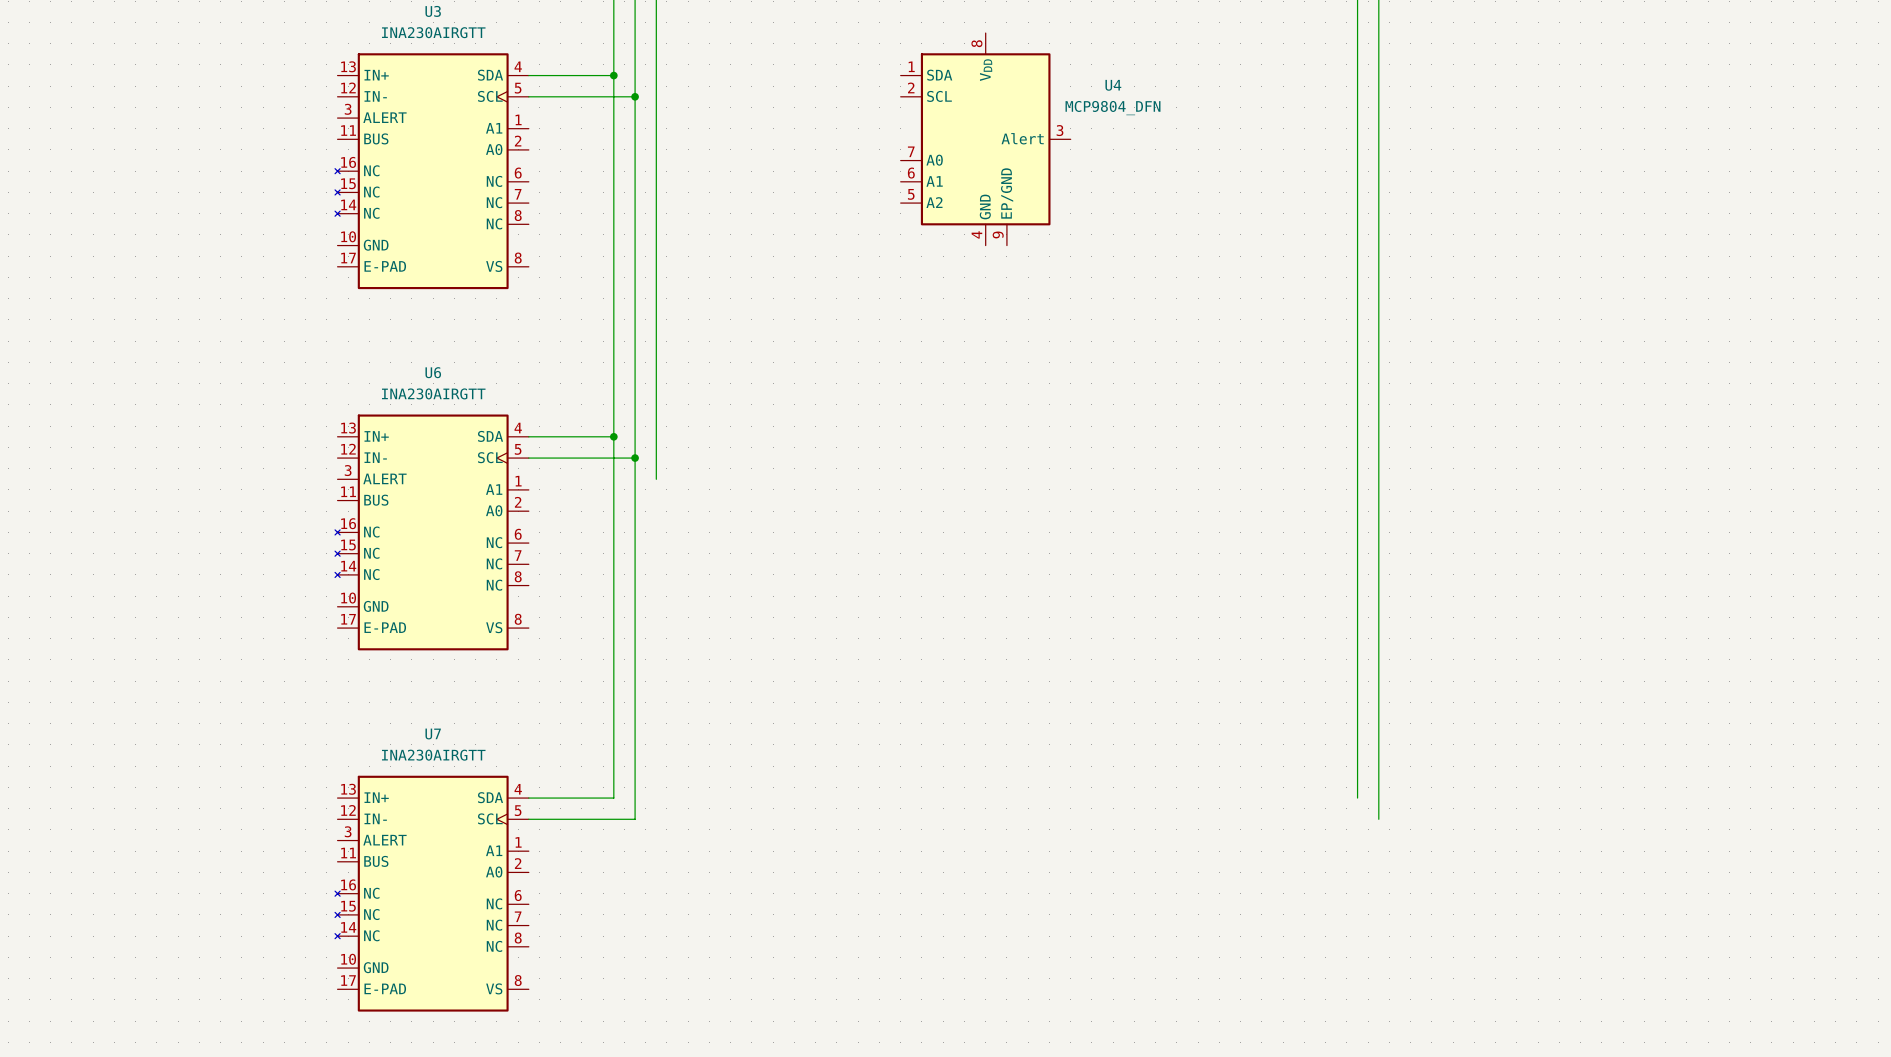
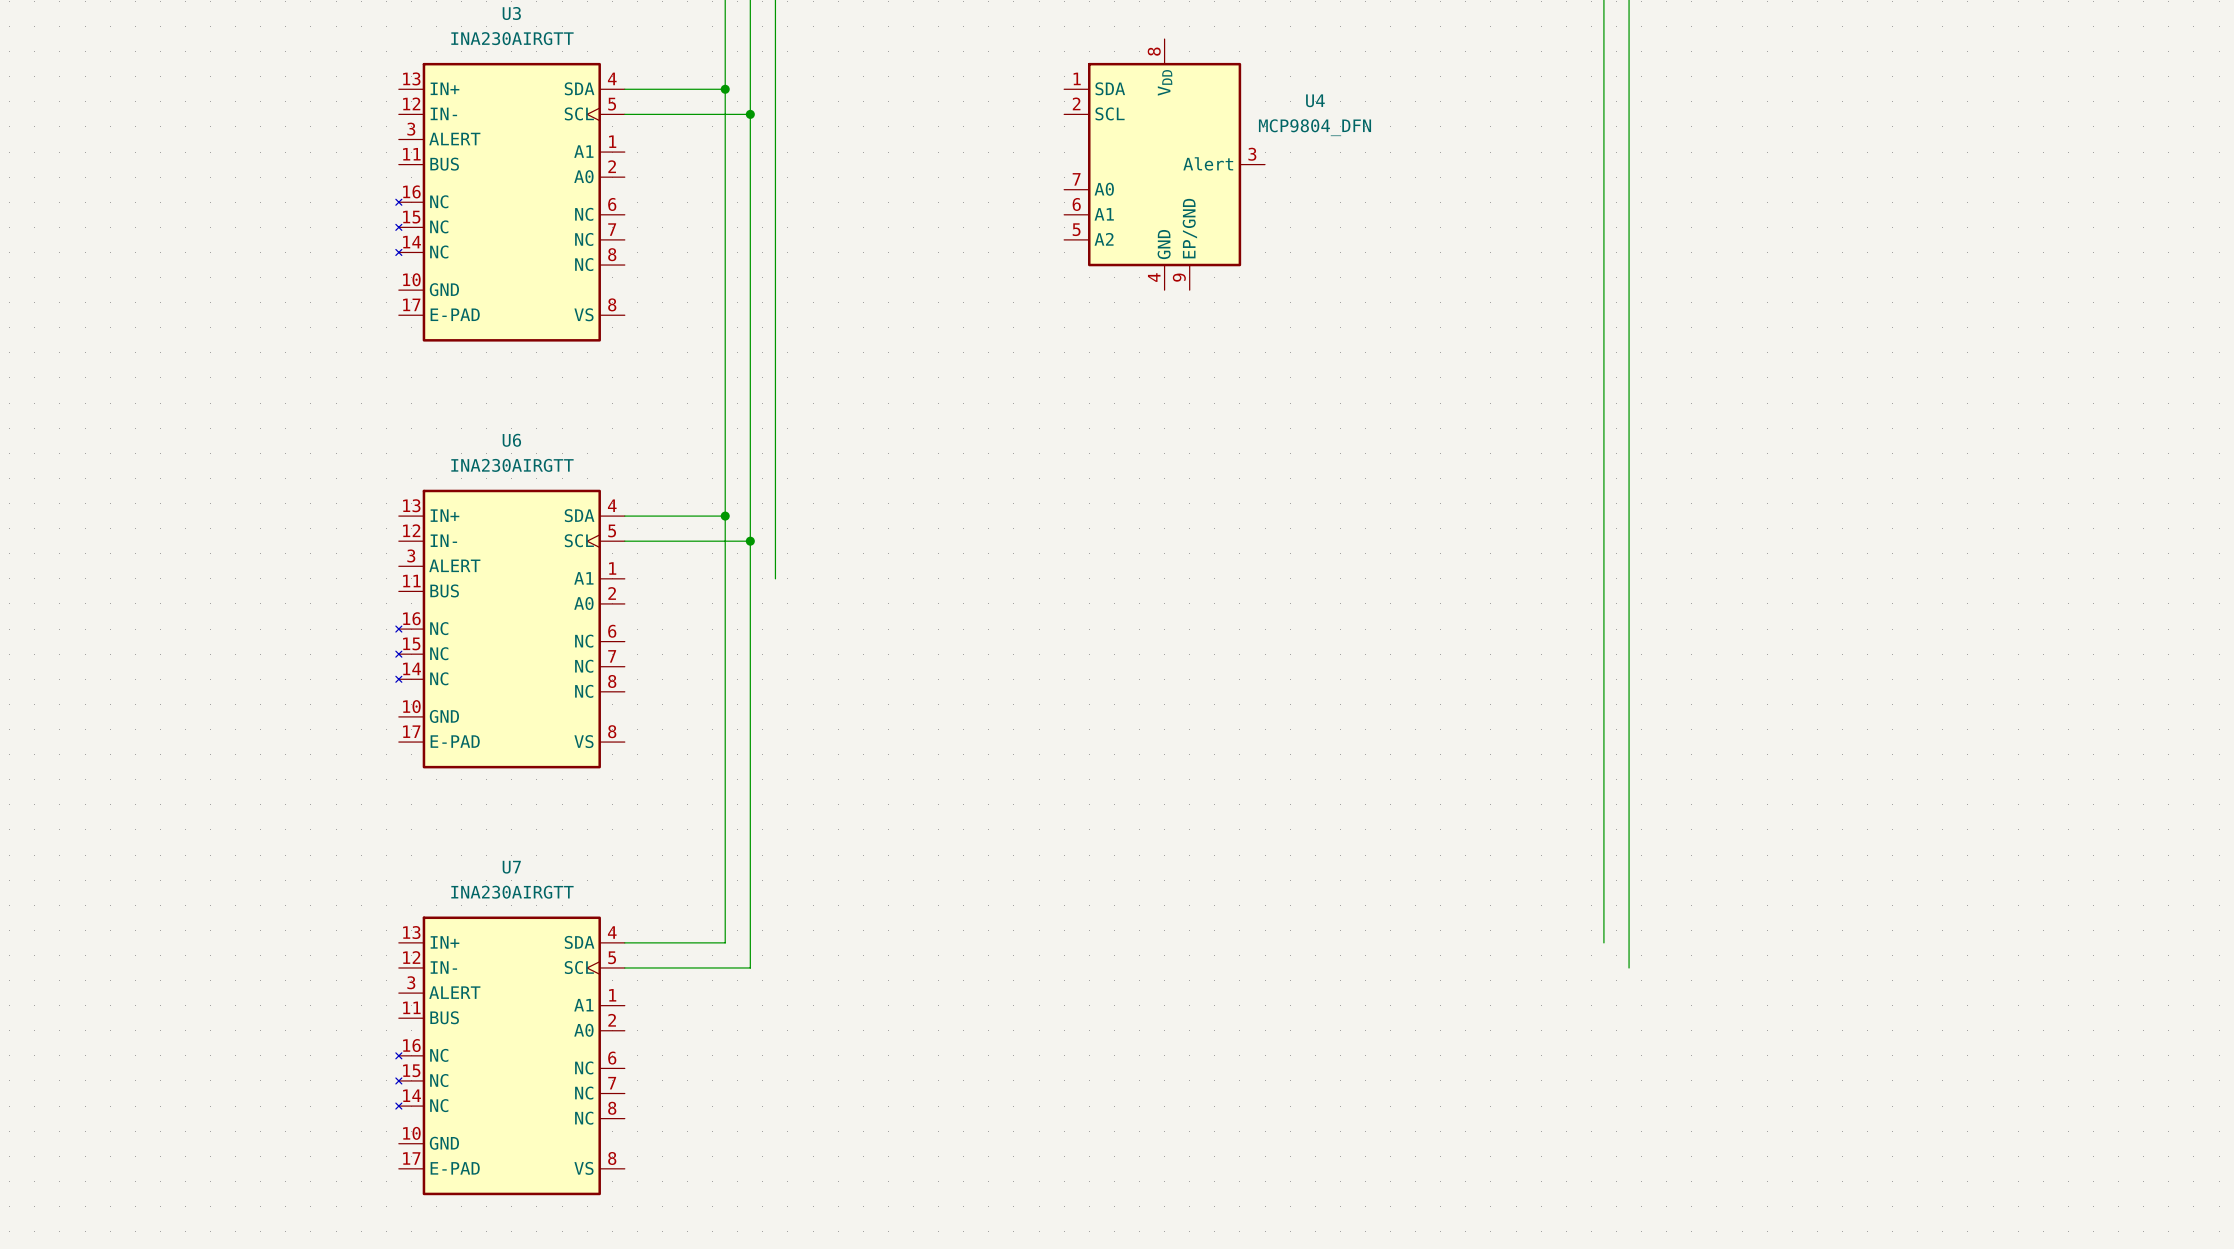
wire: none -> (775, 566) (775, 578)

